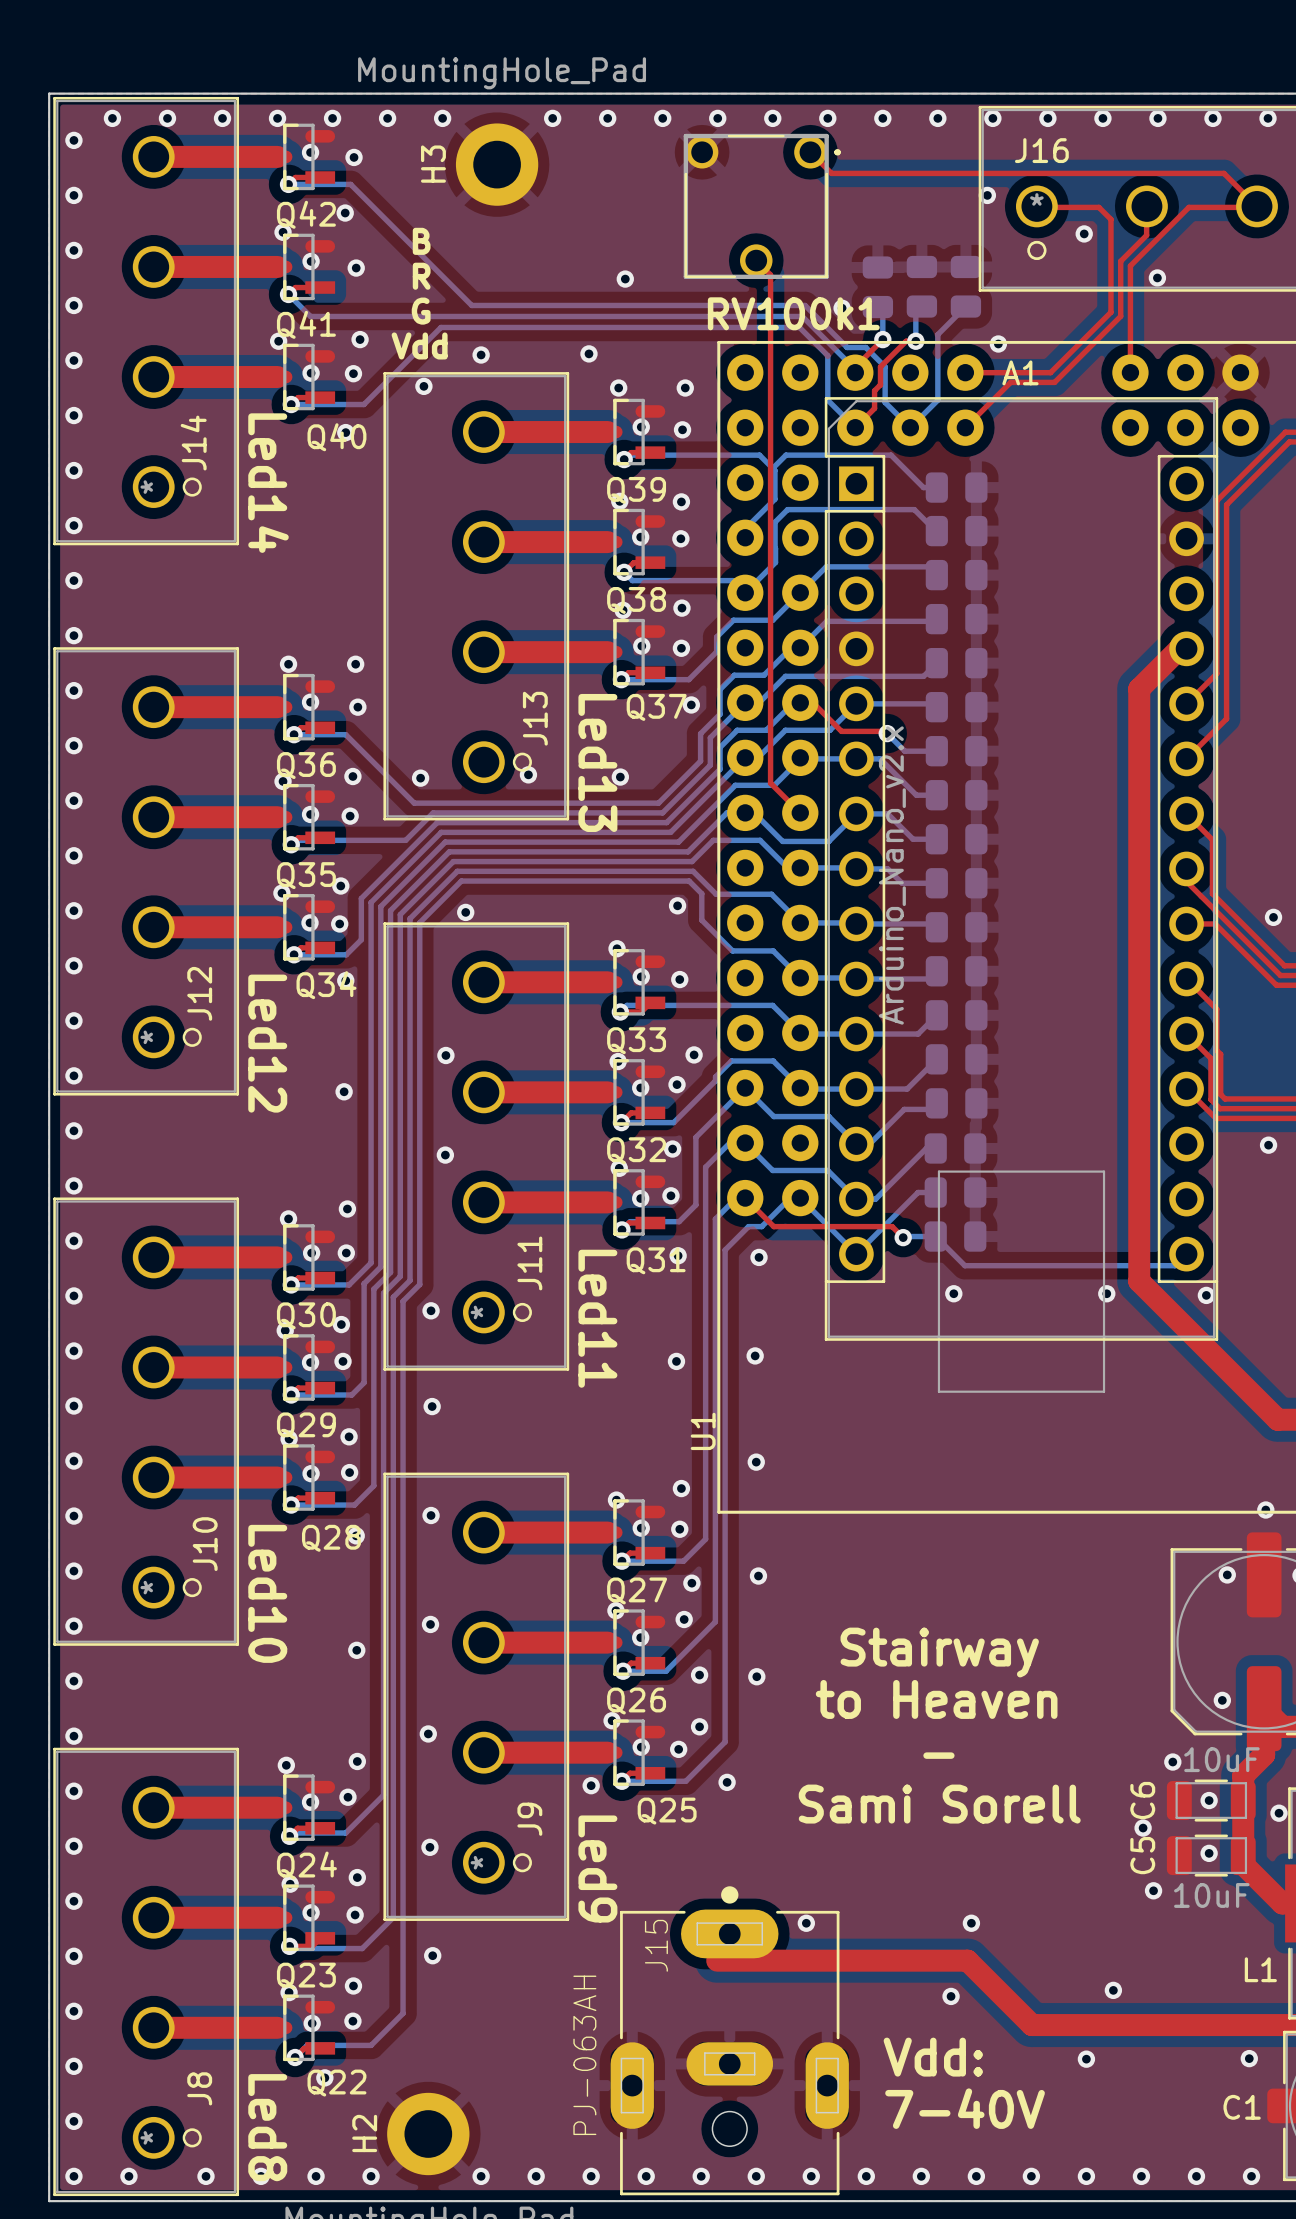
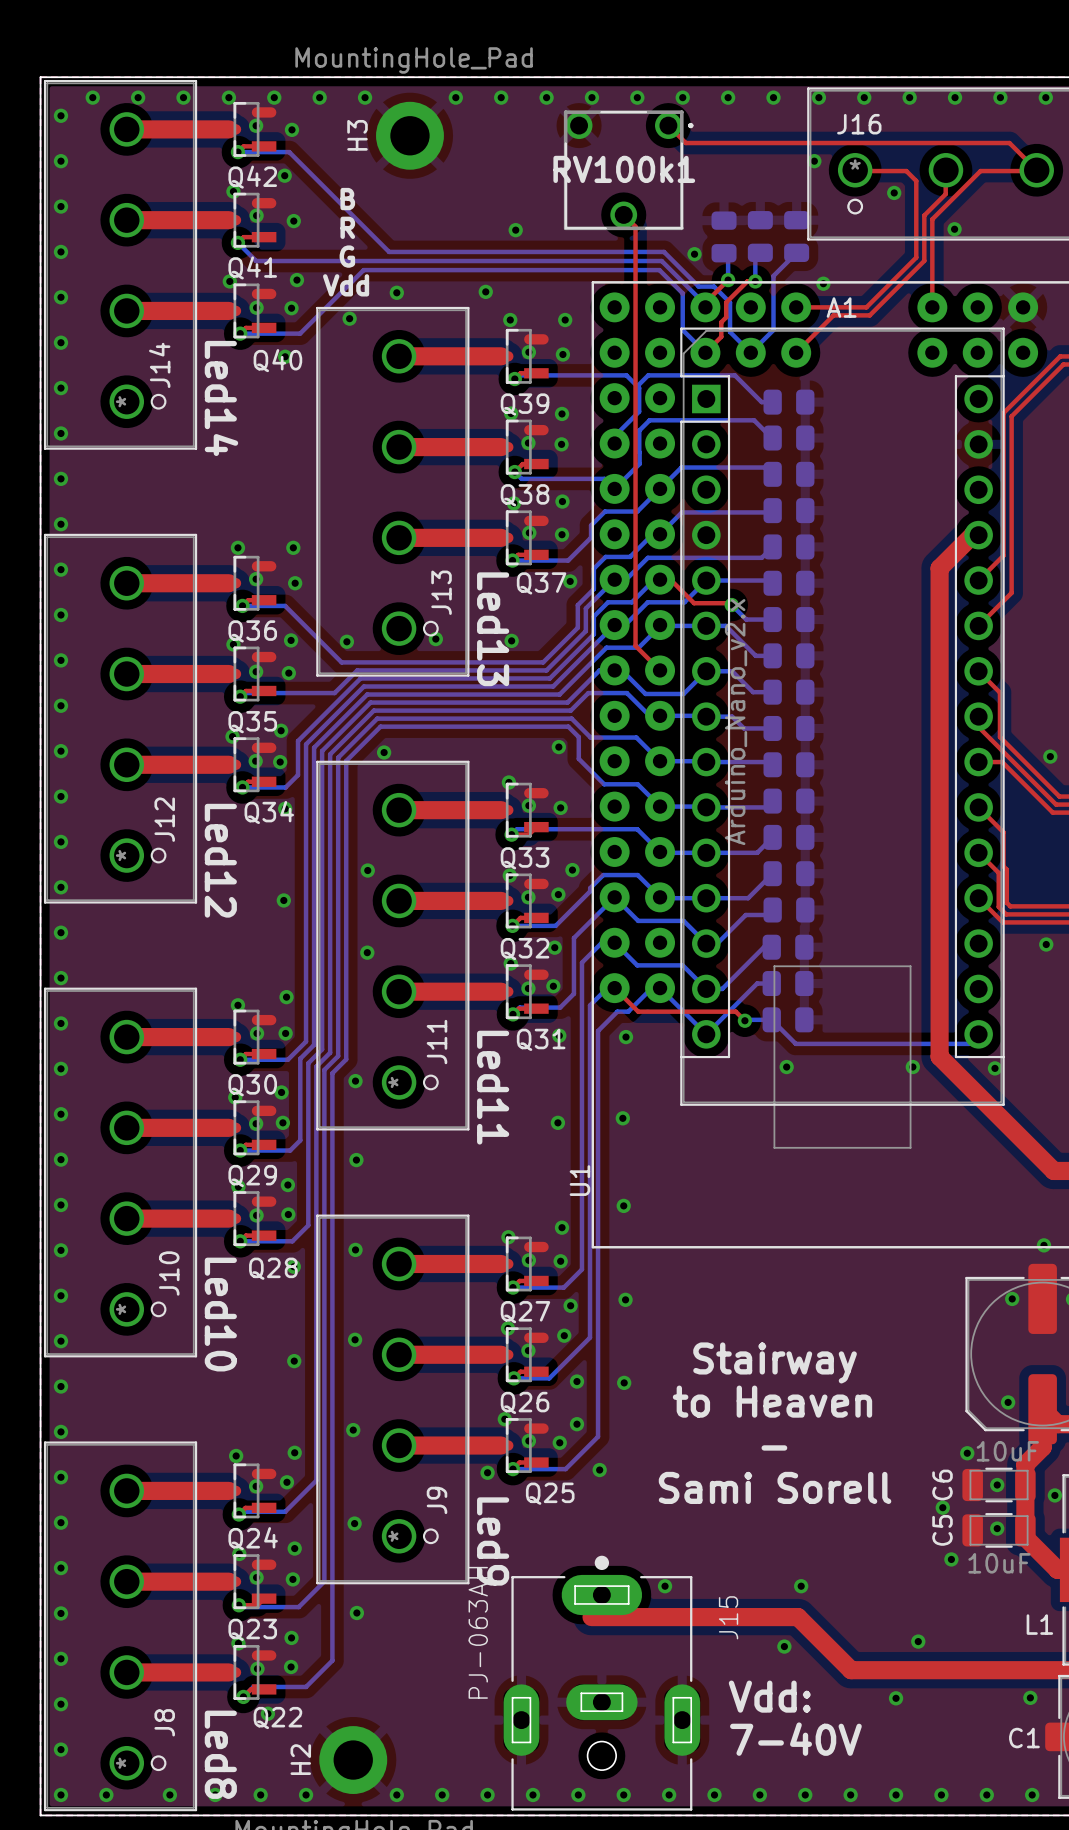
RV100k1 name position: RV100k1 (793, 313) -> RV100k1 (624, 169)
J15 name position: J15 (656, 1945) -> J15 (728, 1617)
J15 value position: PJ-063AH (584, 2055) -> PJ-063AH (478, 1632)

